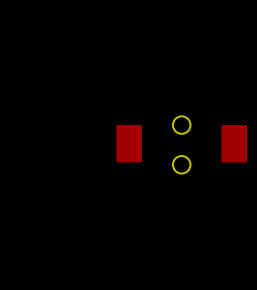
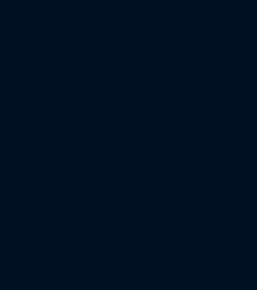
part: (181, 144) -> none

